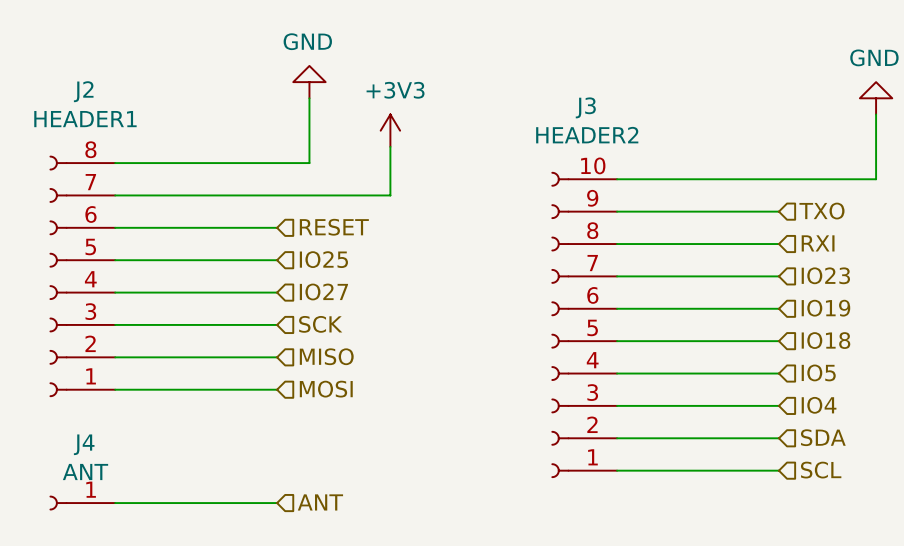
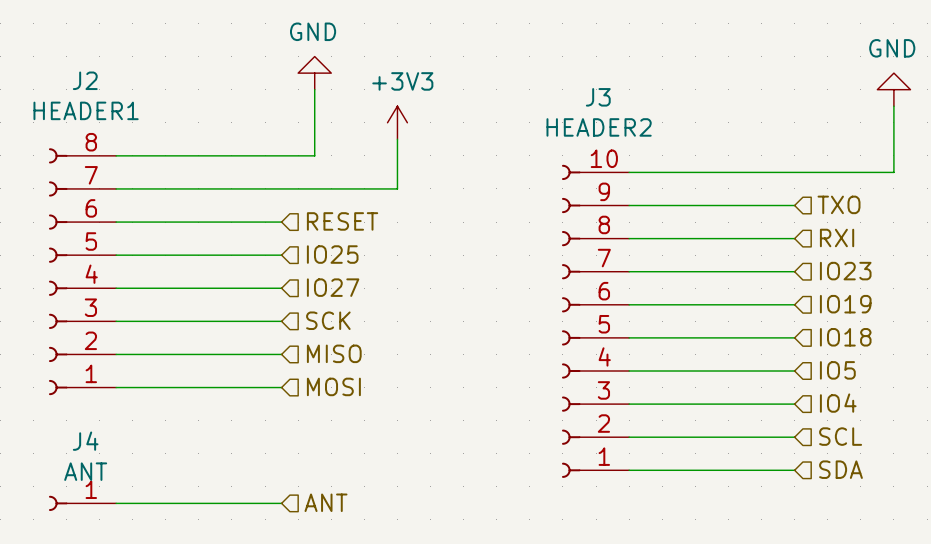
hierarchical label: SDA (823, 437) -> SCL (840, 436)
hierarchical label: SCL (821, 470) -> SDA (840, 469)

